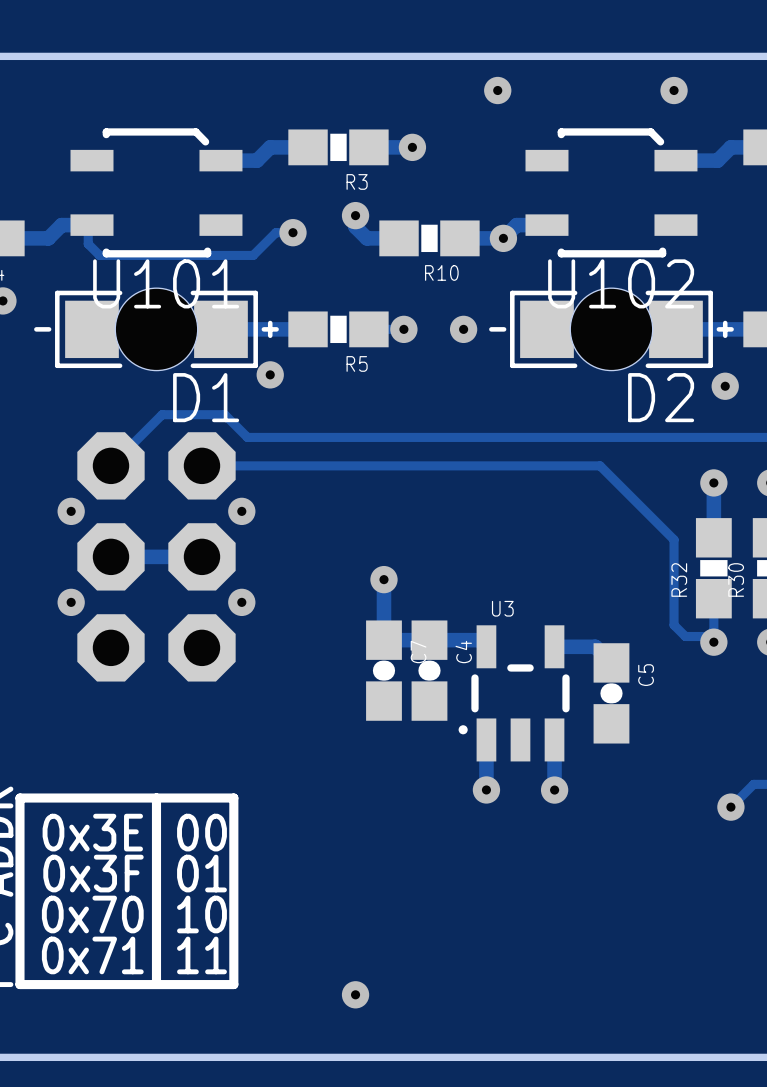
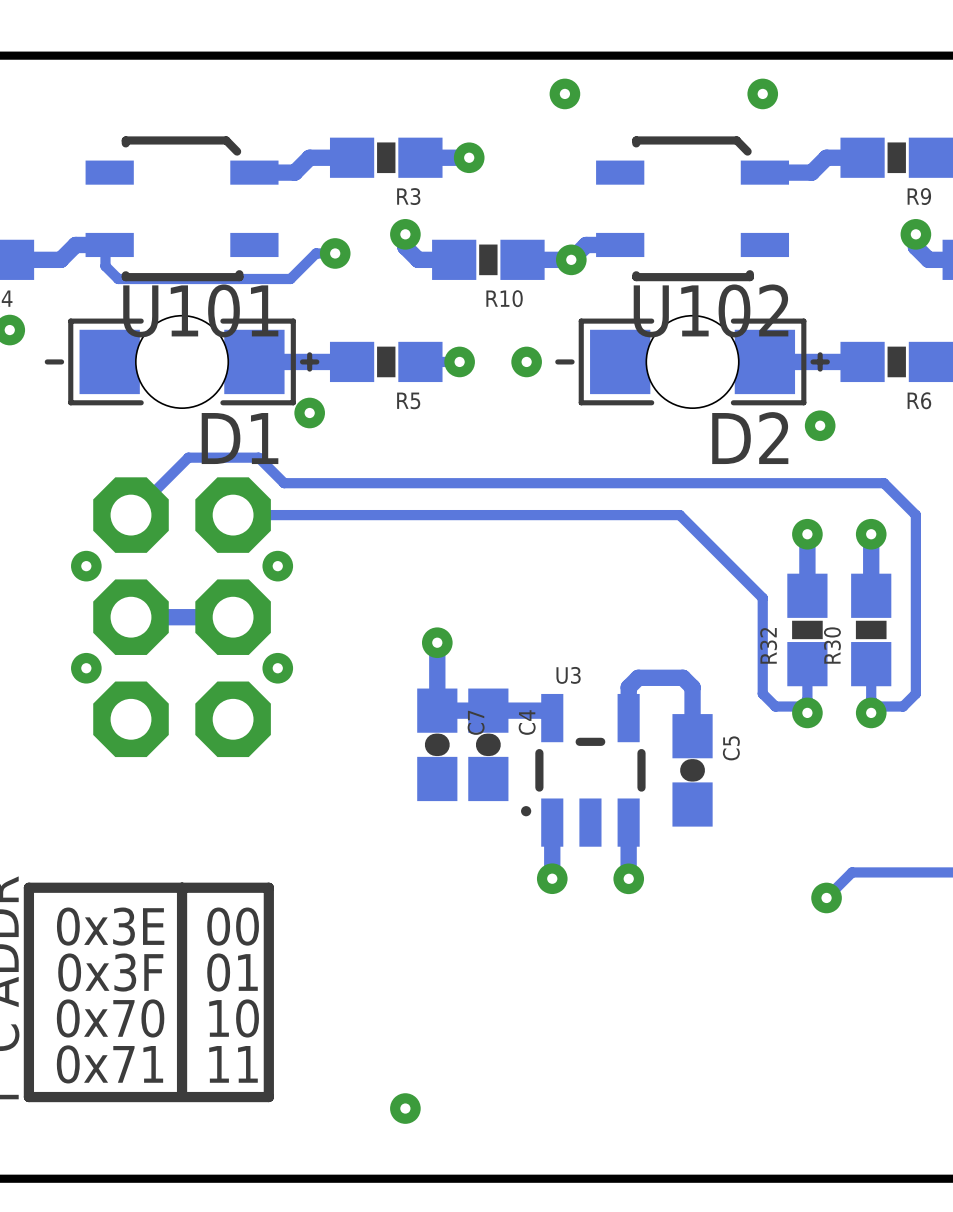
track: (554, 646) (595, 646) (611, 662) -> (628, 718) (628, 687) (638, 677) (682, 677) (692, 687) (692, 736)

